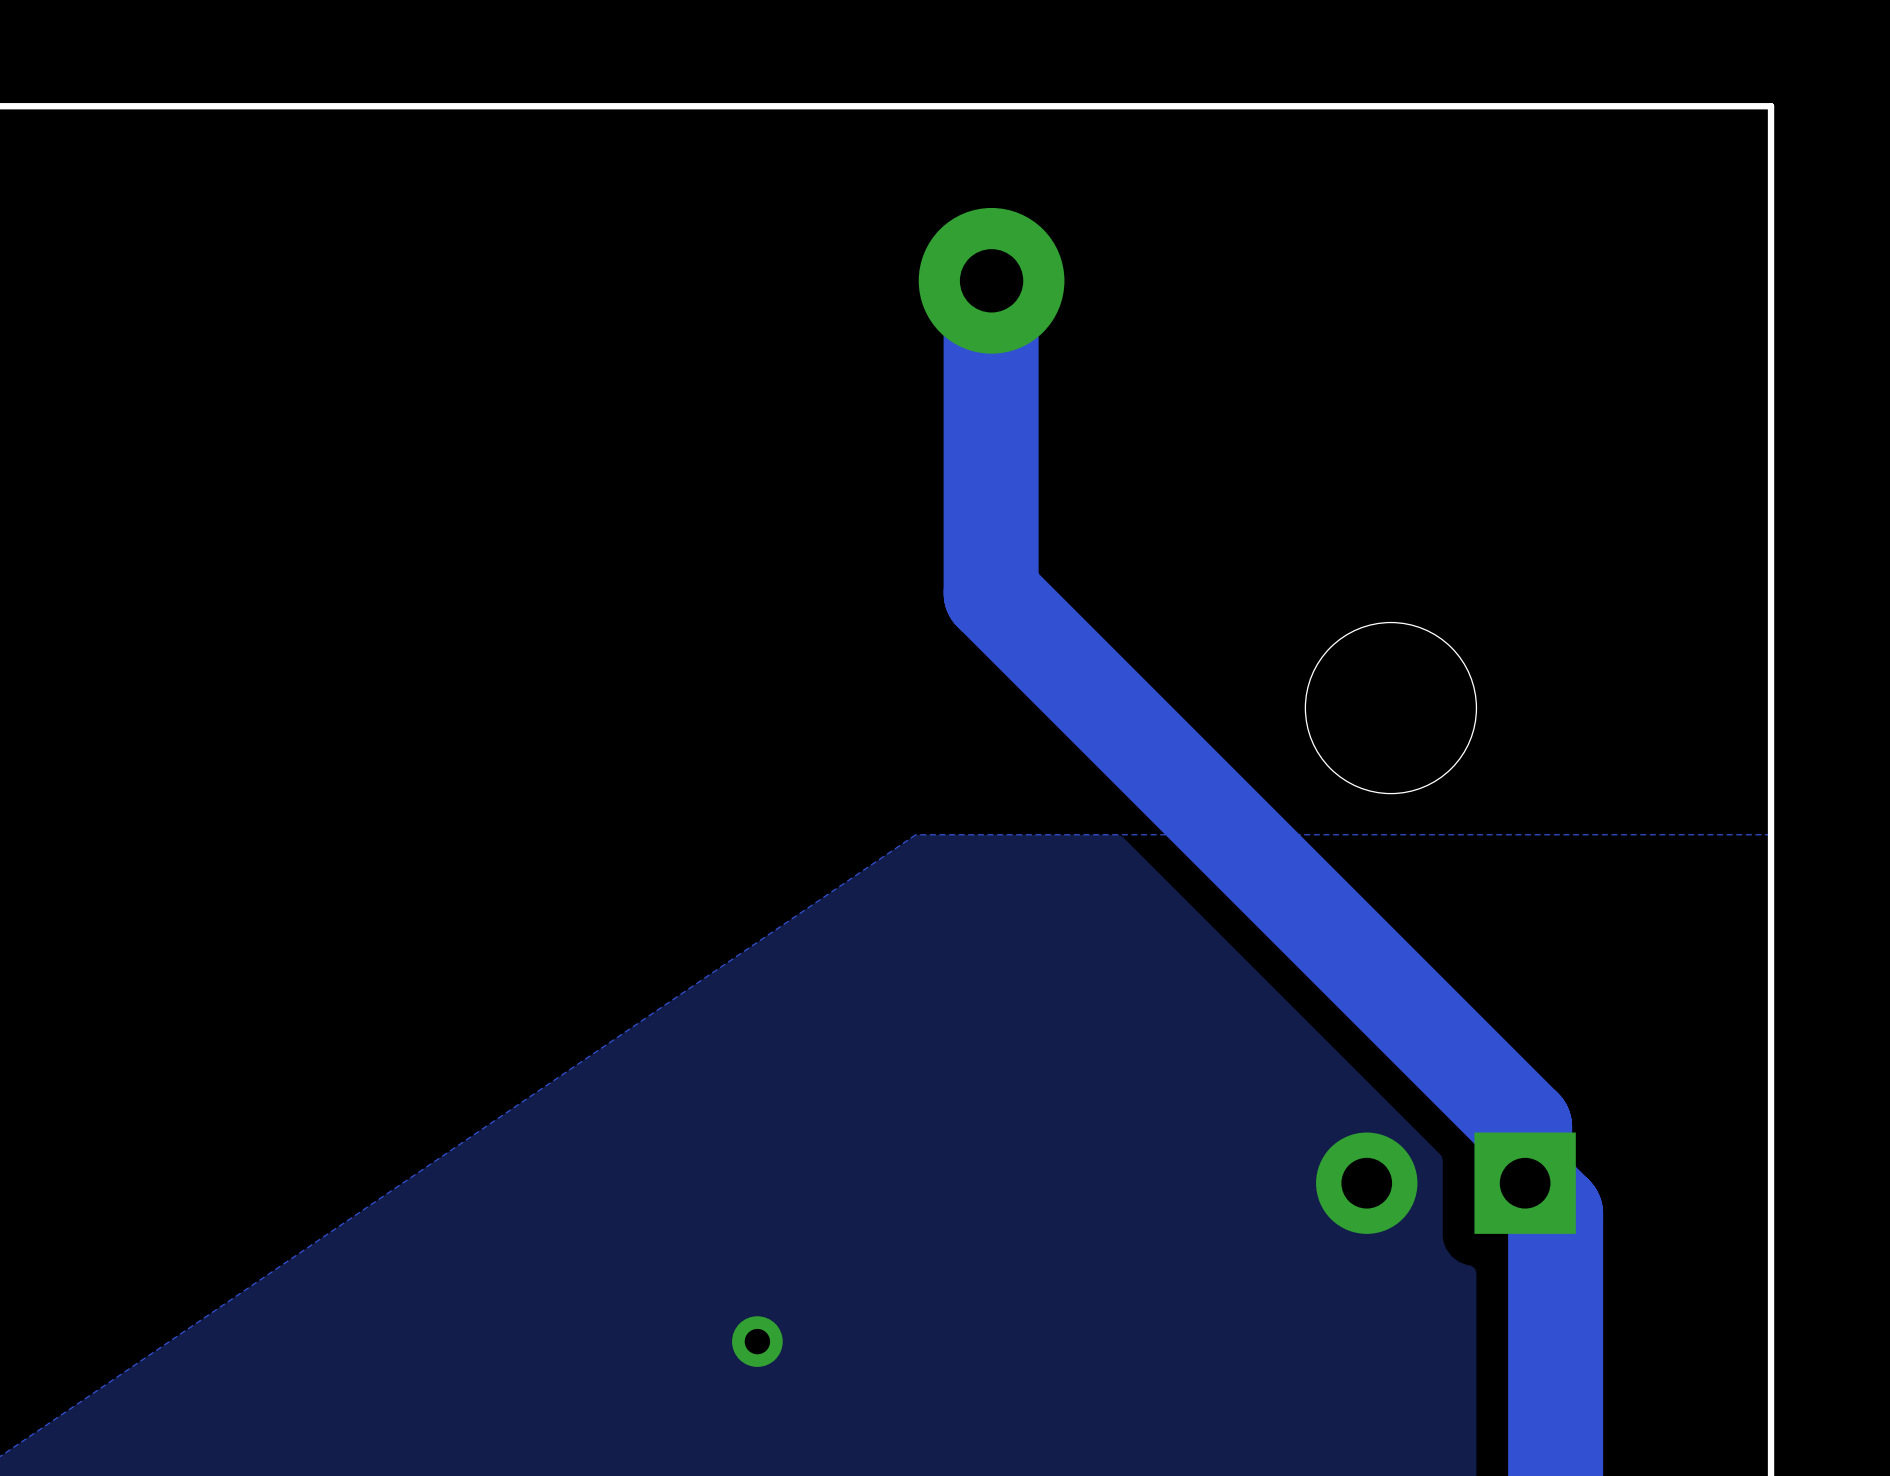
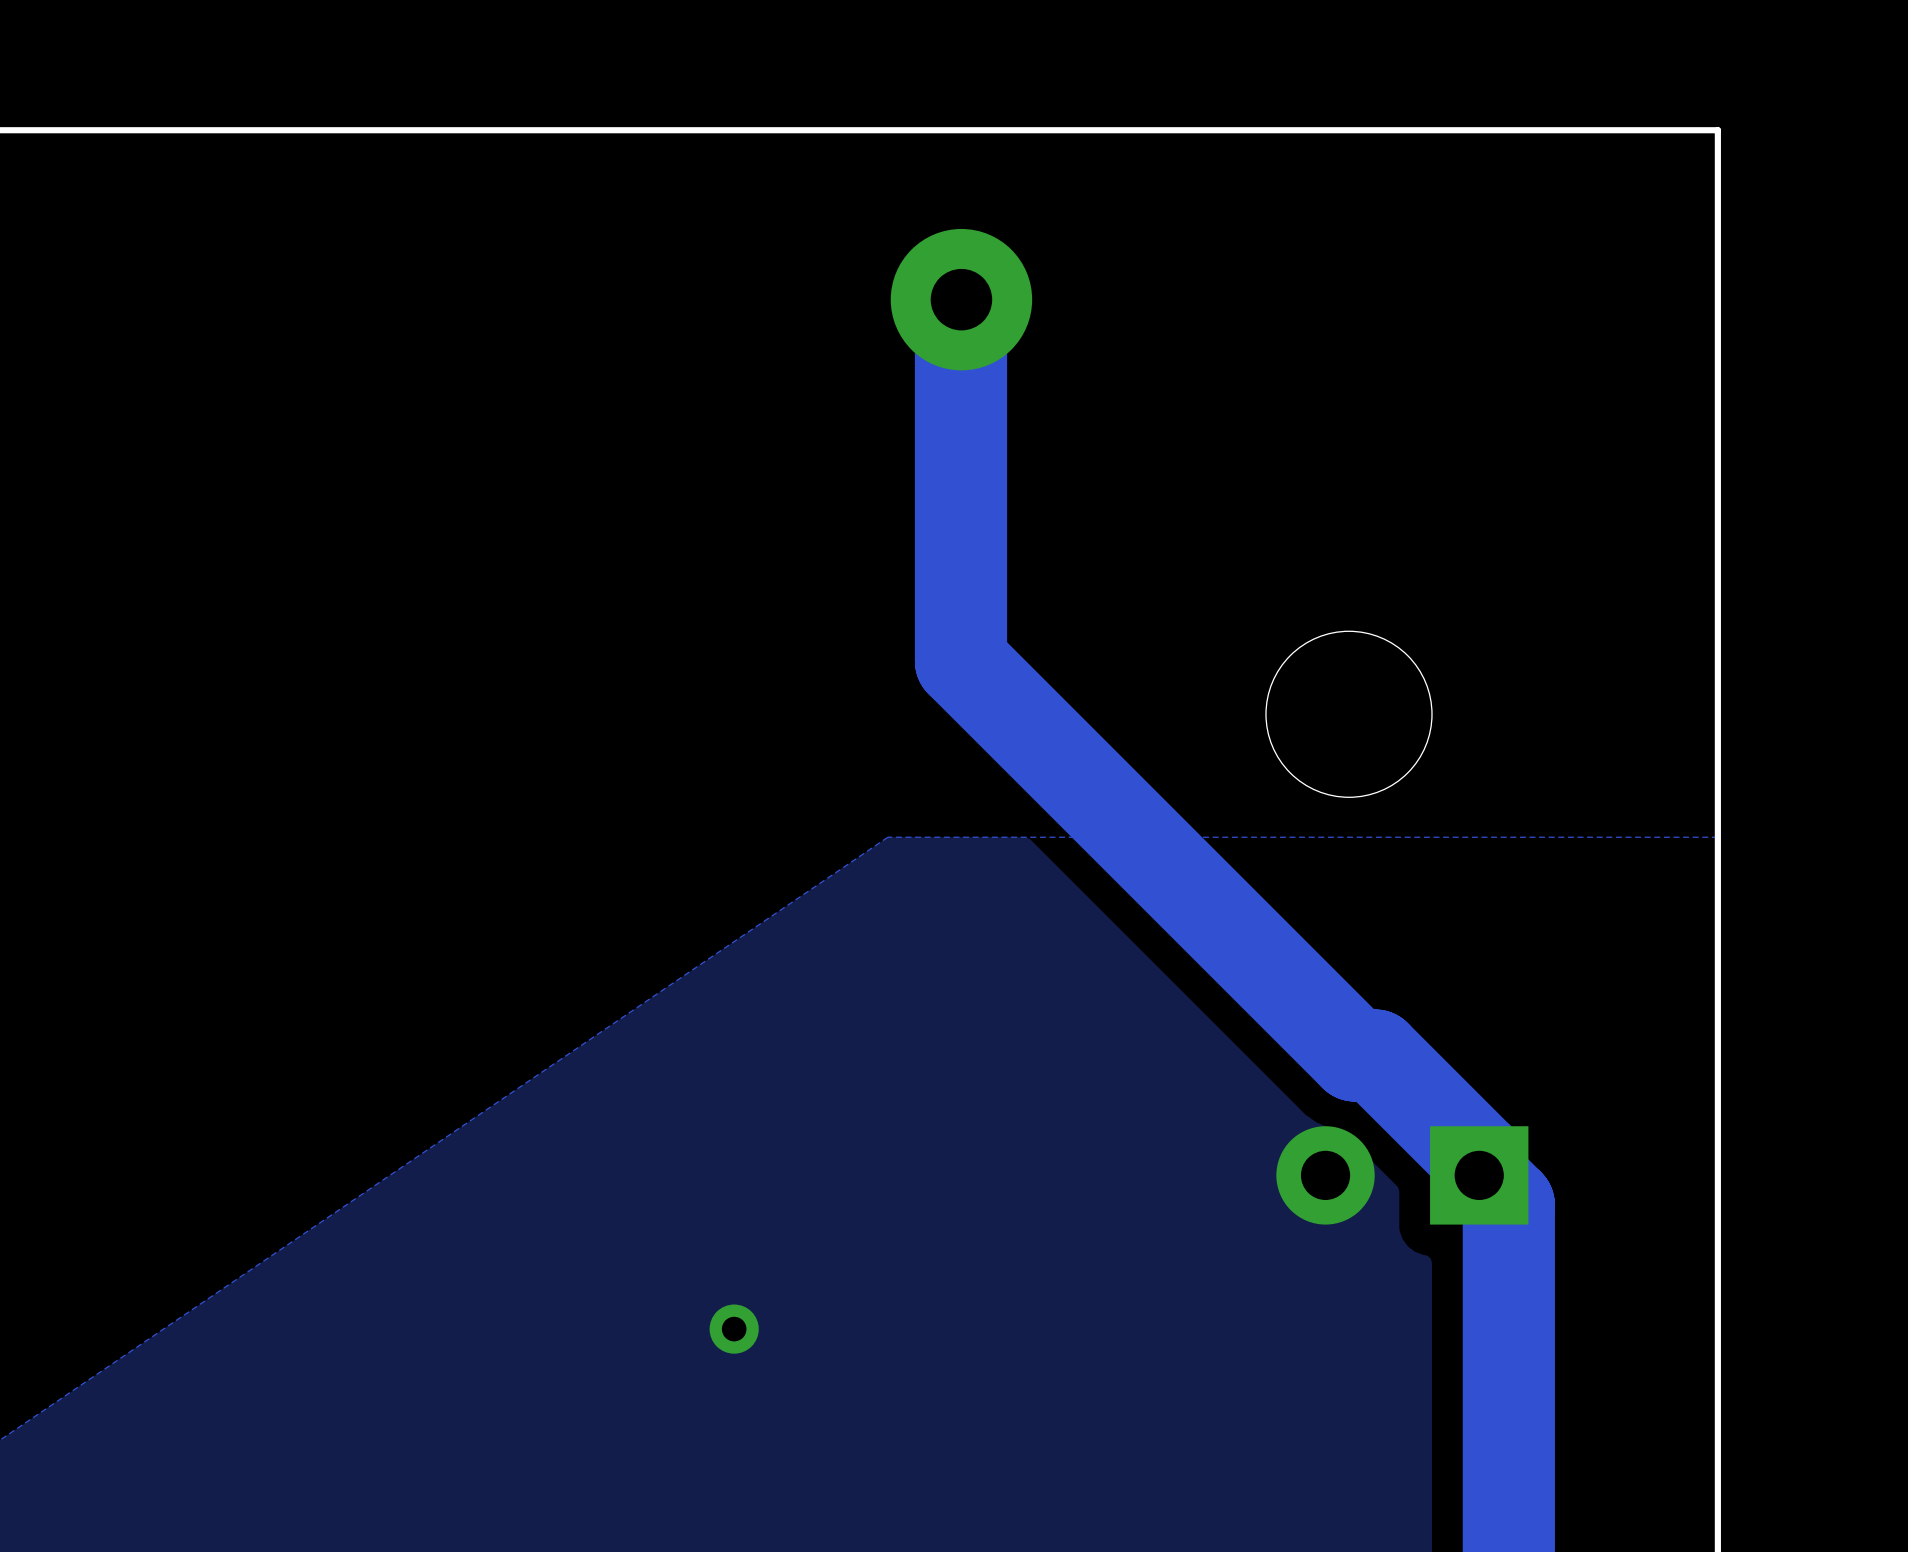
track: (991, 593) (1524, 1126) (1524, 1166) -> (960, 602) (960, 661) (1355, 1055) (1375, 1055) (1478, 1159)

